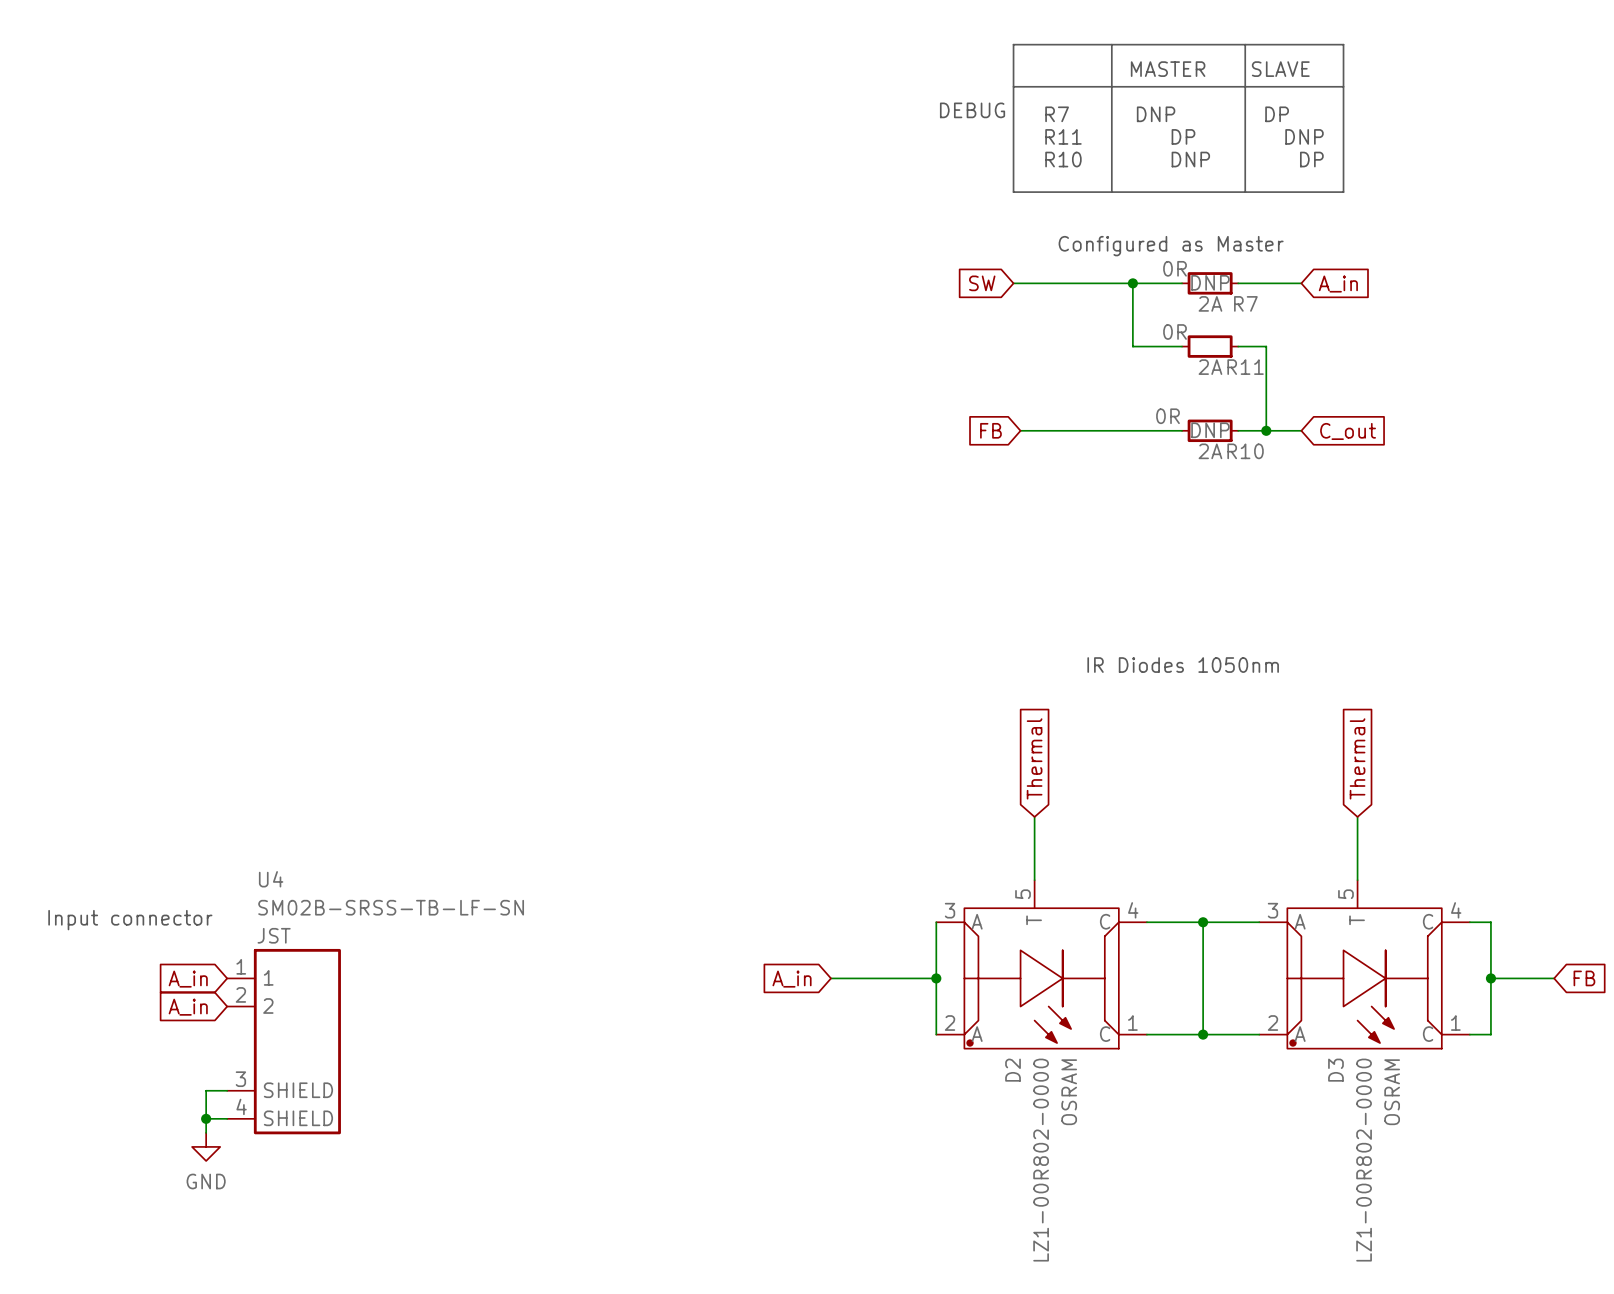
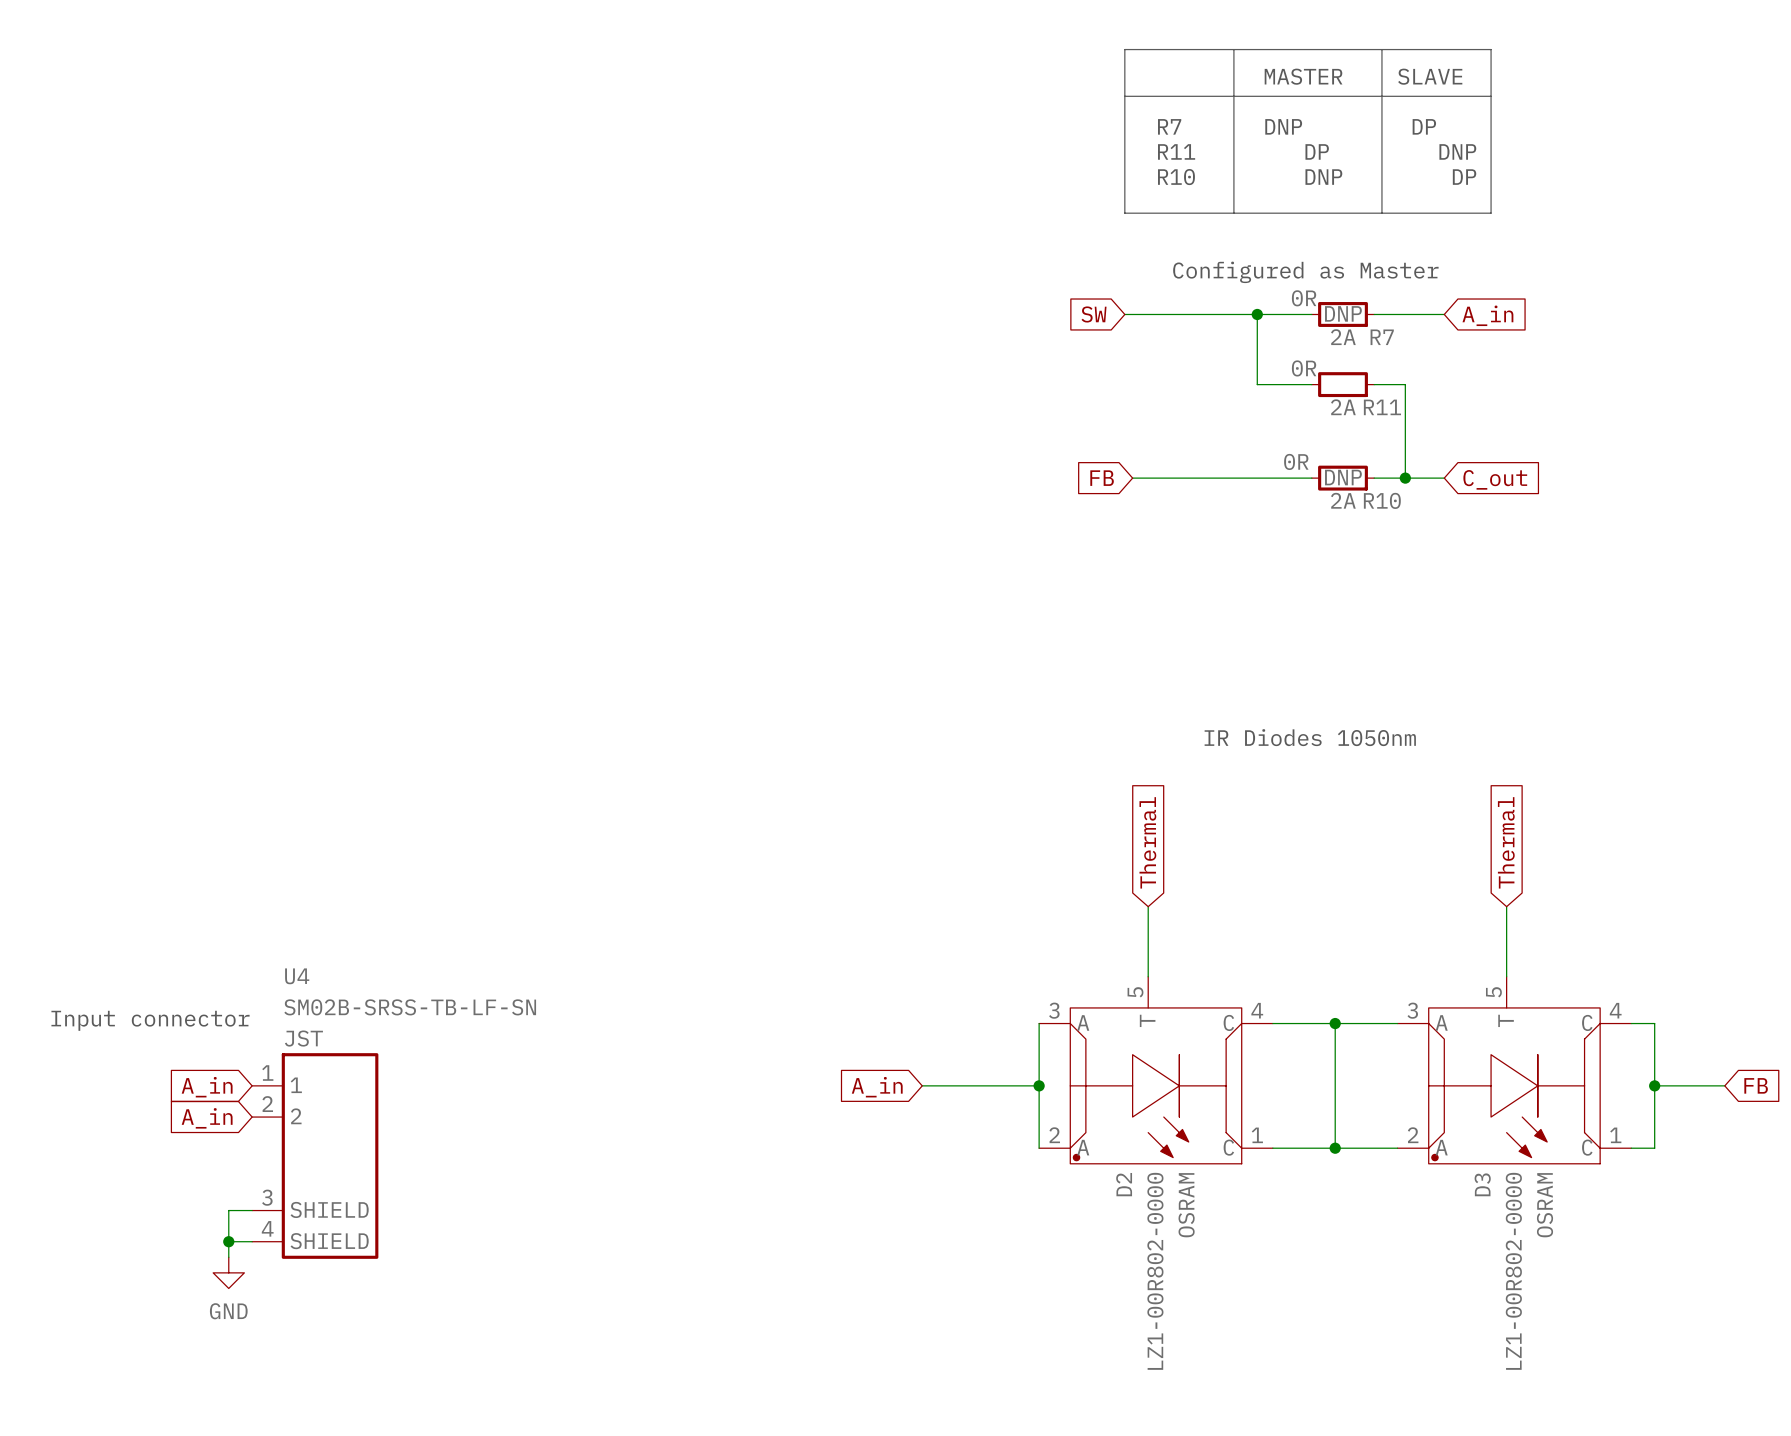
text: DEBUG (972, 110) -> none

